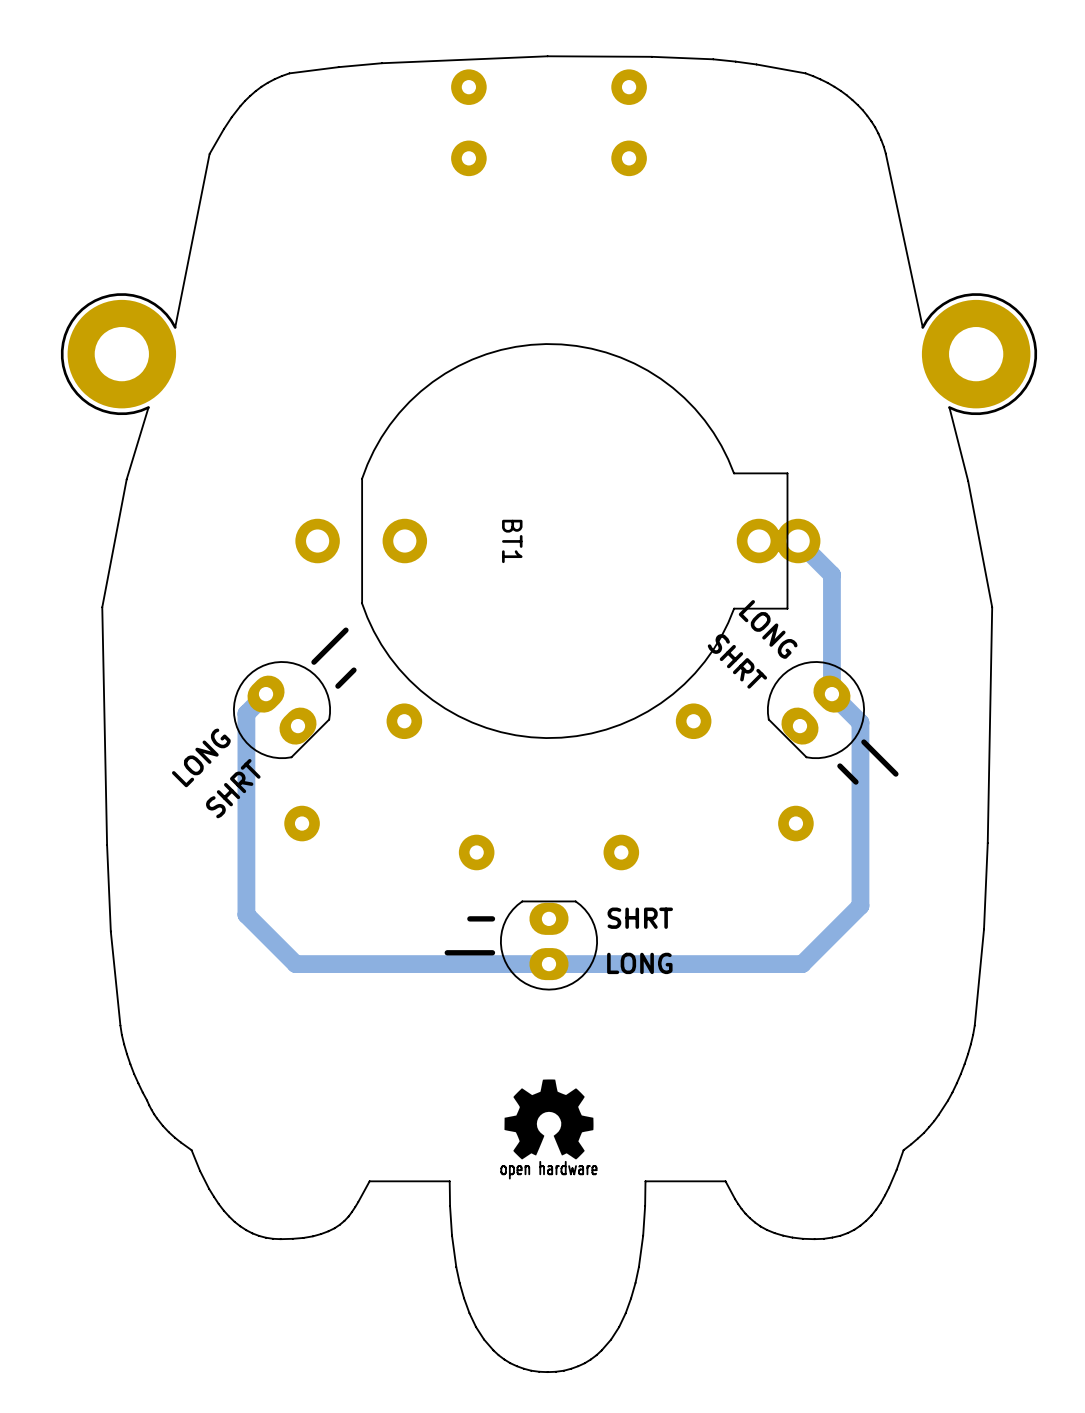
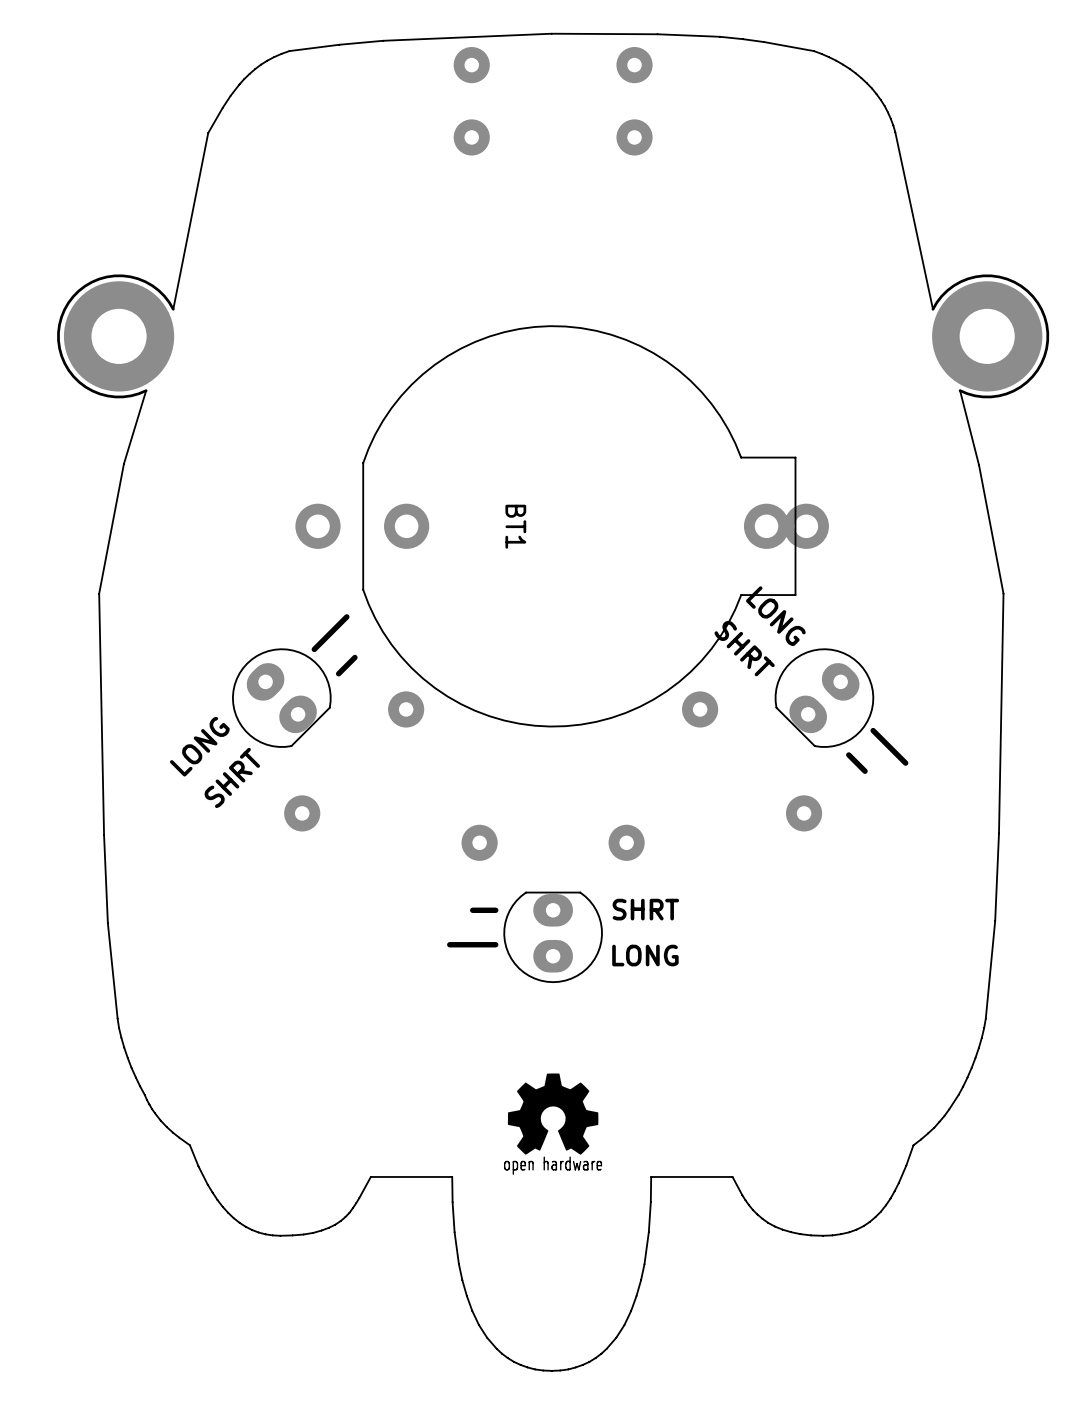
track: (759, 541) (798, 541) (831, 574) (831, 694) (860, 722) (860, 905) (802, 964) (295, 964) (246, 914) (246, 713) (266, 694) -> none

